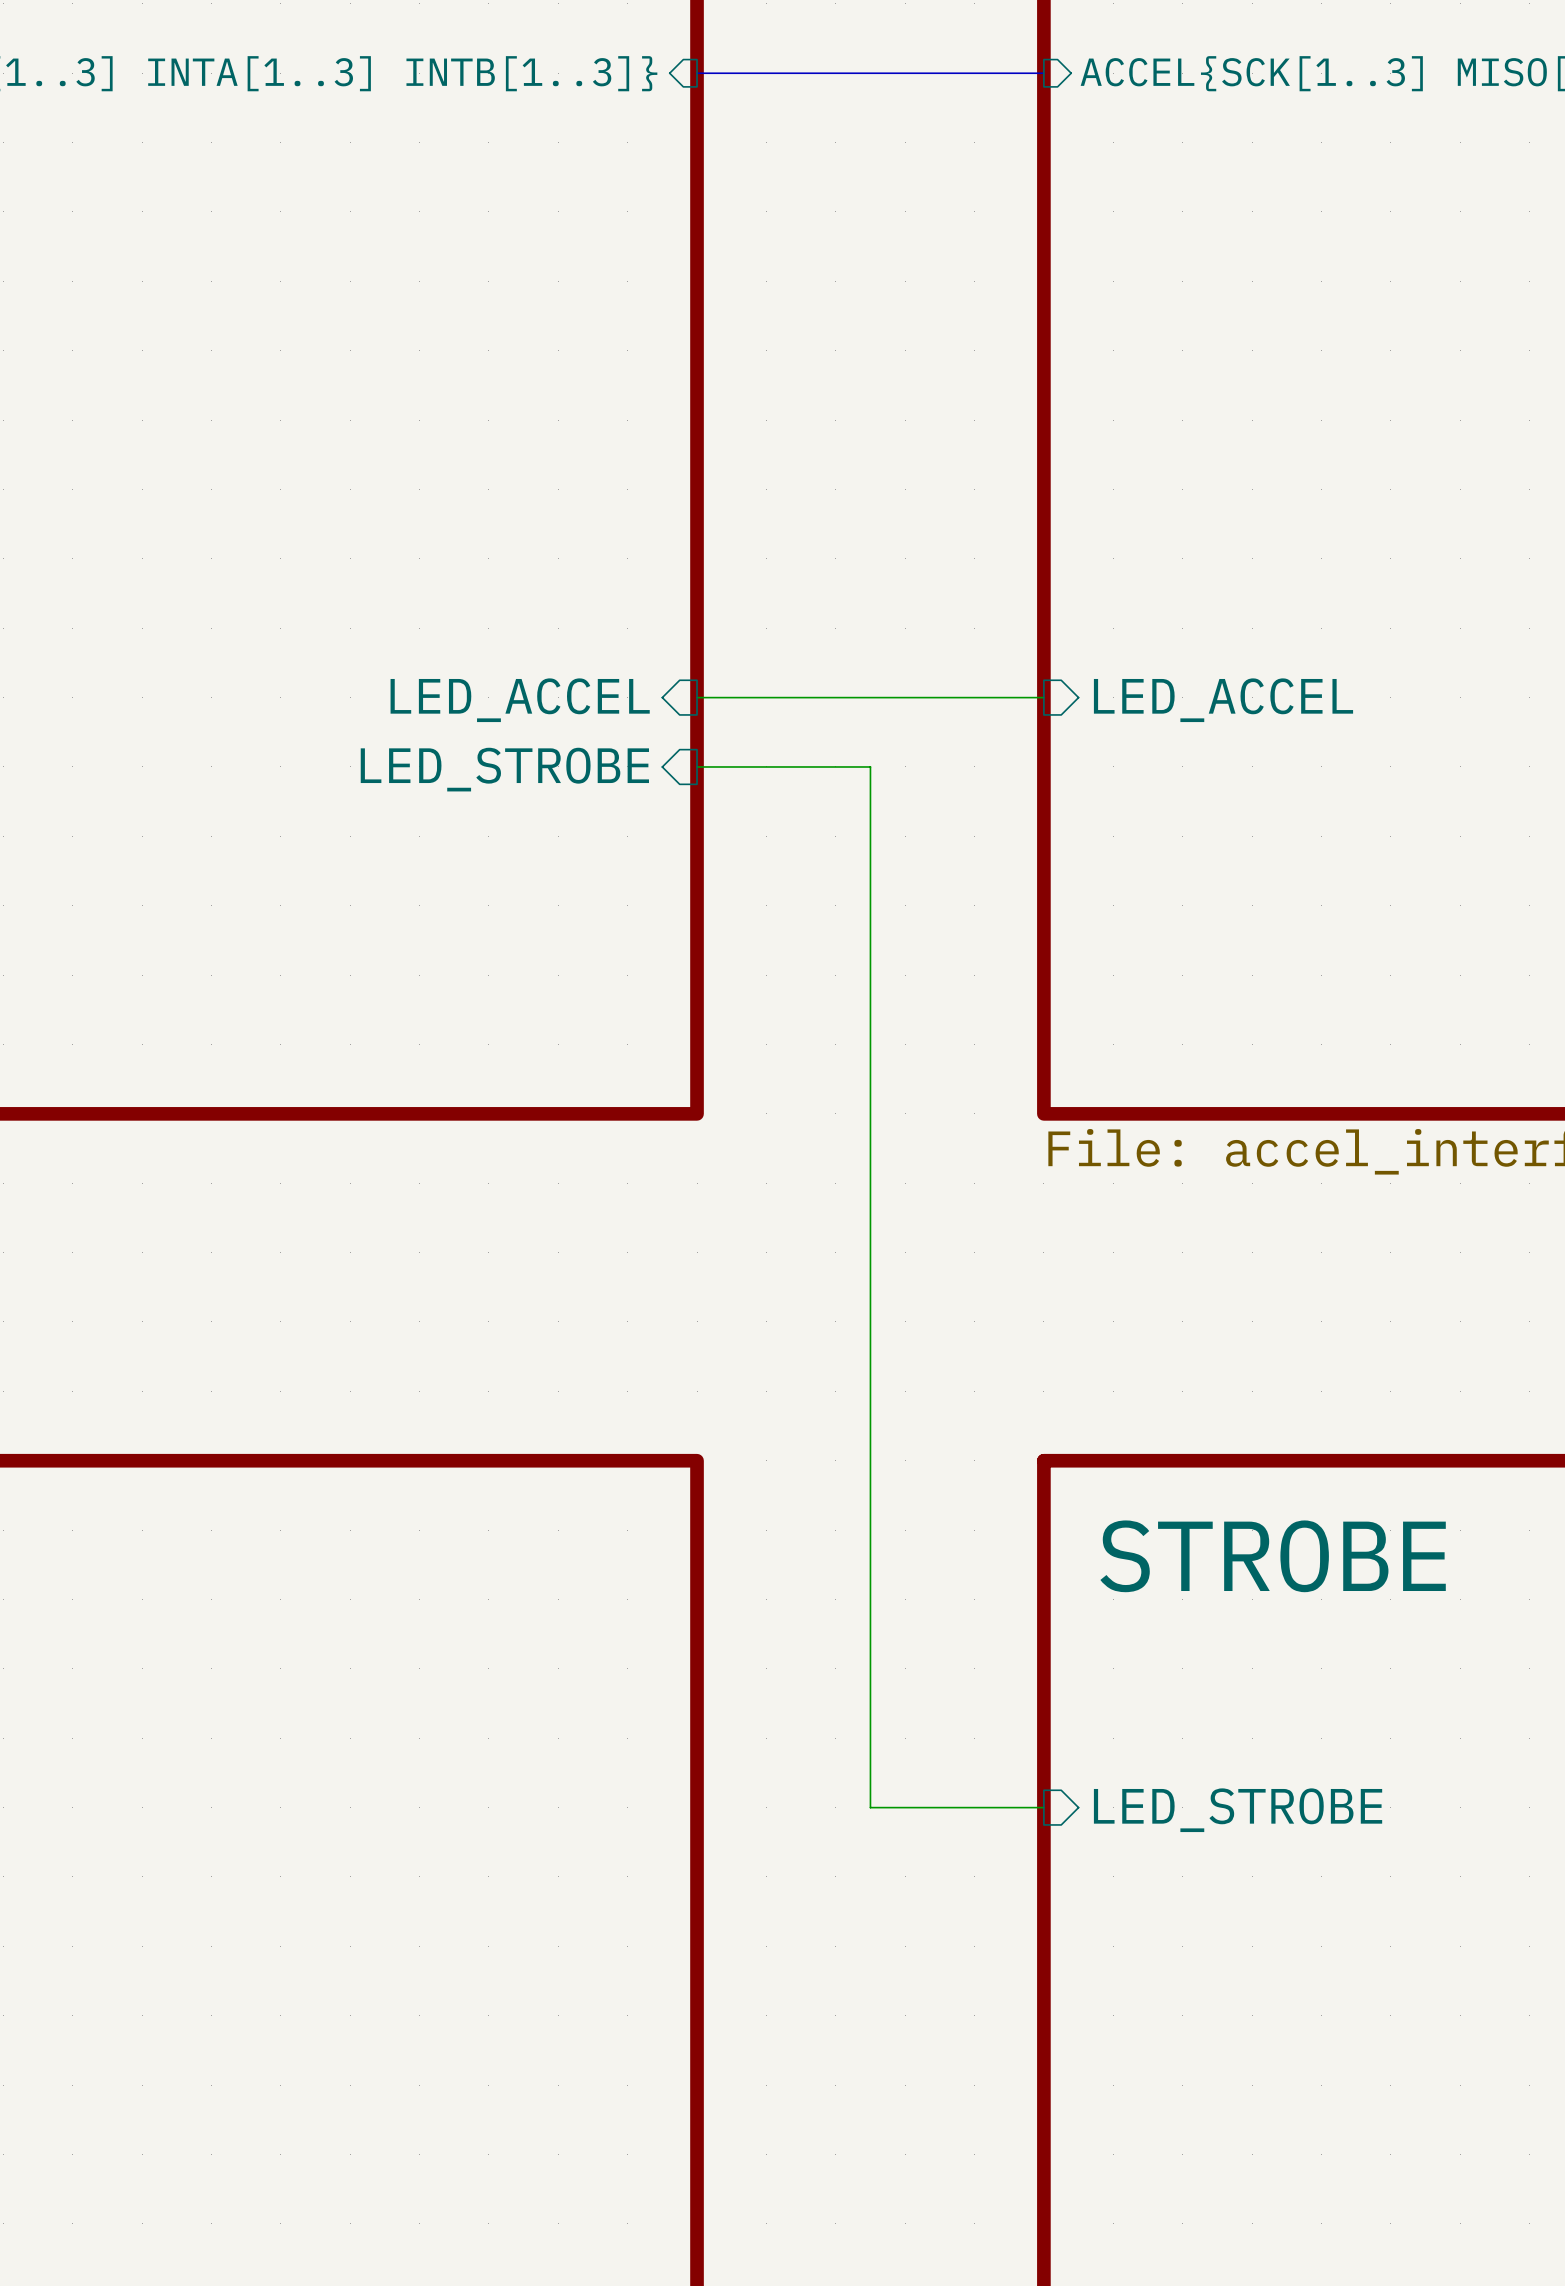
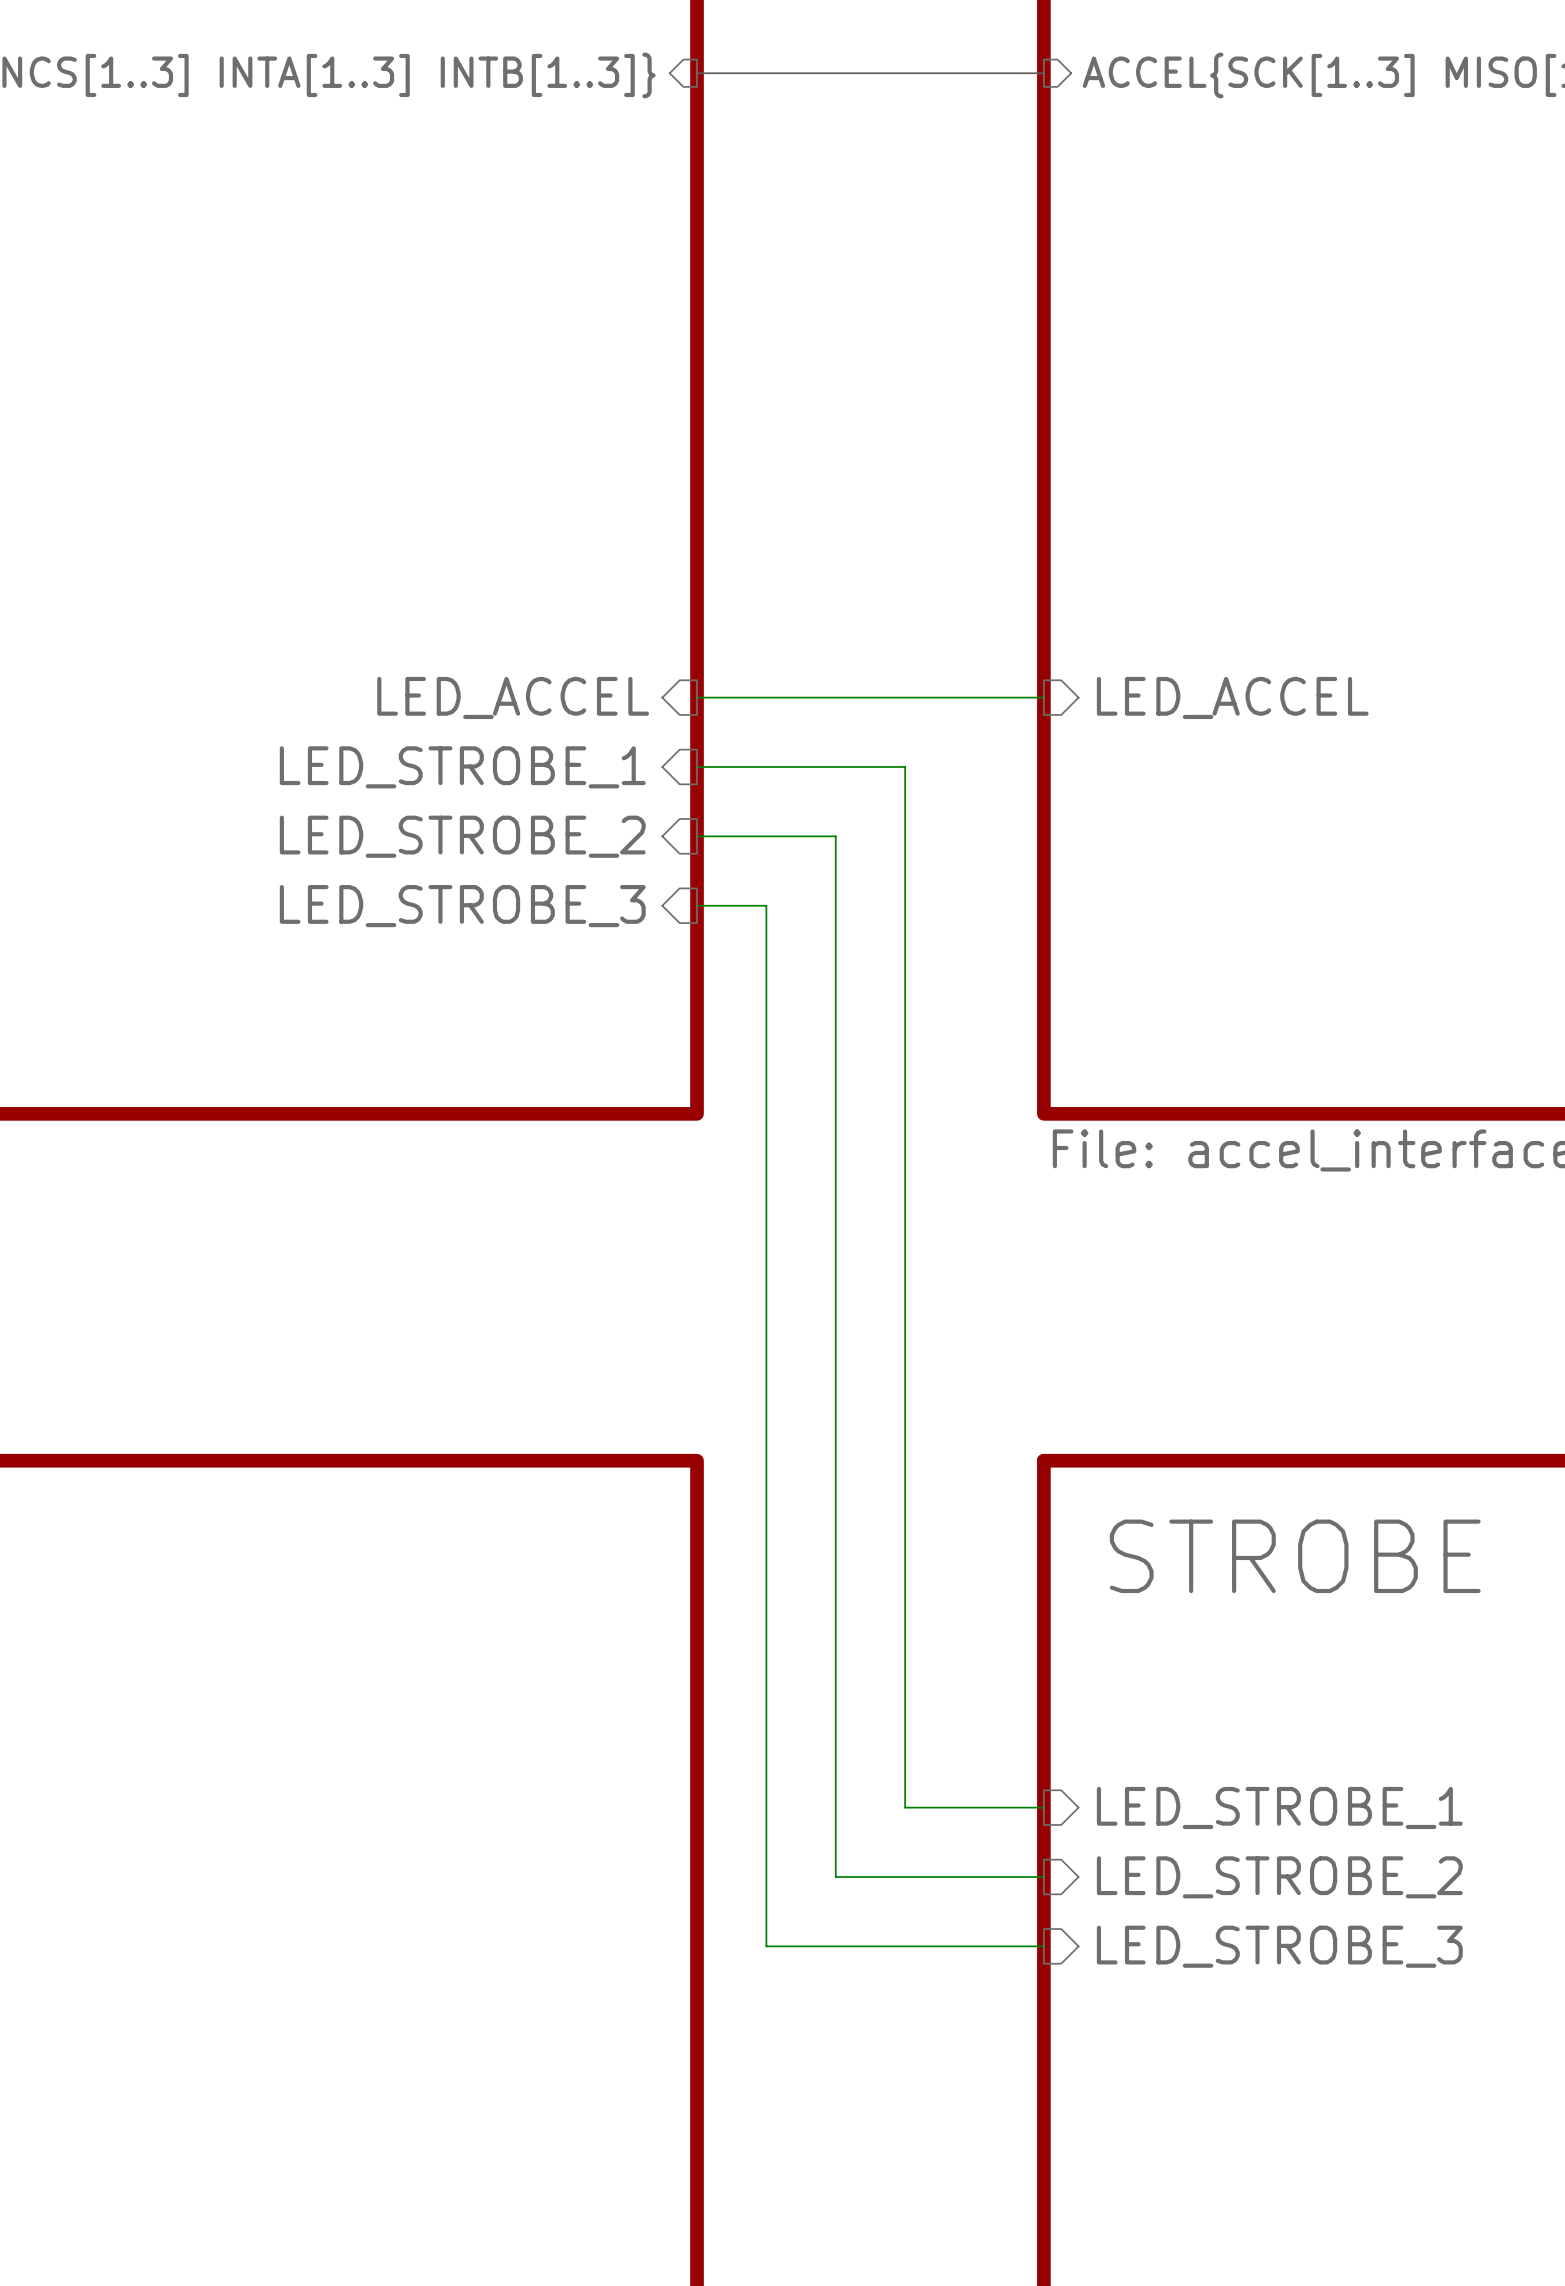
wire: (870, 766) (870, 1807) (905, 1807) -> (870, 766) (905, 766) (905, 1807)
sheet pin: LED_STROBE (504, 769) -> LED_STROBE_1 (462, 767)
wire: none -> (697, 836) (835, 836) (835, 1876) (1043, 1876)
sheet pin: none -> LED_STROBE_2 (462, 836)
wire: none -> (697, 905) (766, 905) (766, 1946) (1043, 1946)
sheet pin: none -> LED_STROBE_3 (462, 906)
sheet pin: LED_STROBE (1238, 1810) -> LED_STROBE_1 (1279, 1807)
sheet pin: none -> LED_STROBE_2 (1279, 1877)
sheet pin: none -> LED_STROBE_3 (1279, 1946)

